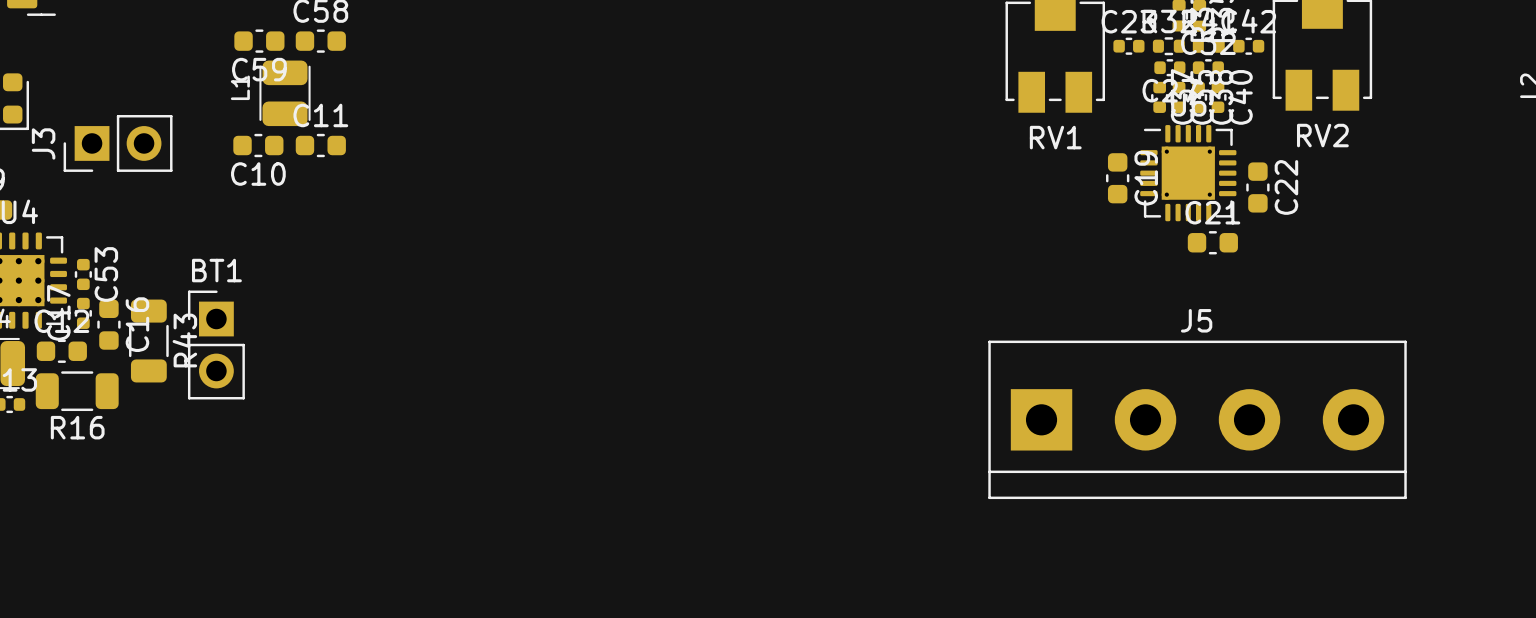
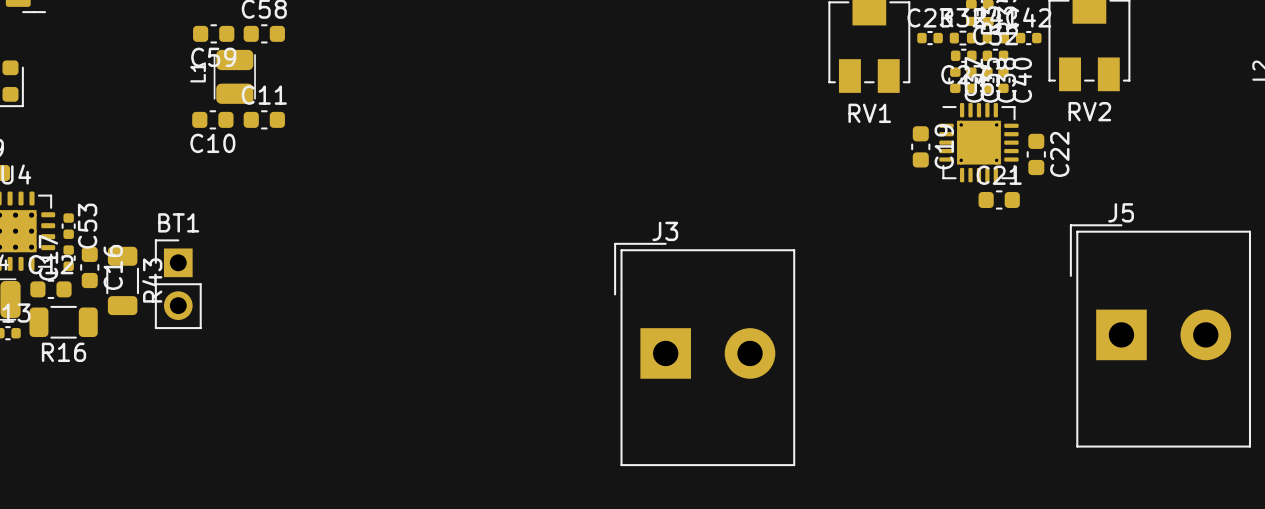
J3 footprint: [63, 115, 173, 172] -> [614, 242, 796, 467]
J3 name position: J3 (43, 143) -> J3 (665, 231)
J5 name position: J5 (1196, 320) -> J5 (1121, 212)
J5 footprint: [988, 340, 1407, 500] -> [1069, 224, 1251, 448]

